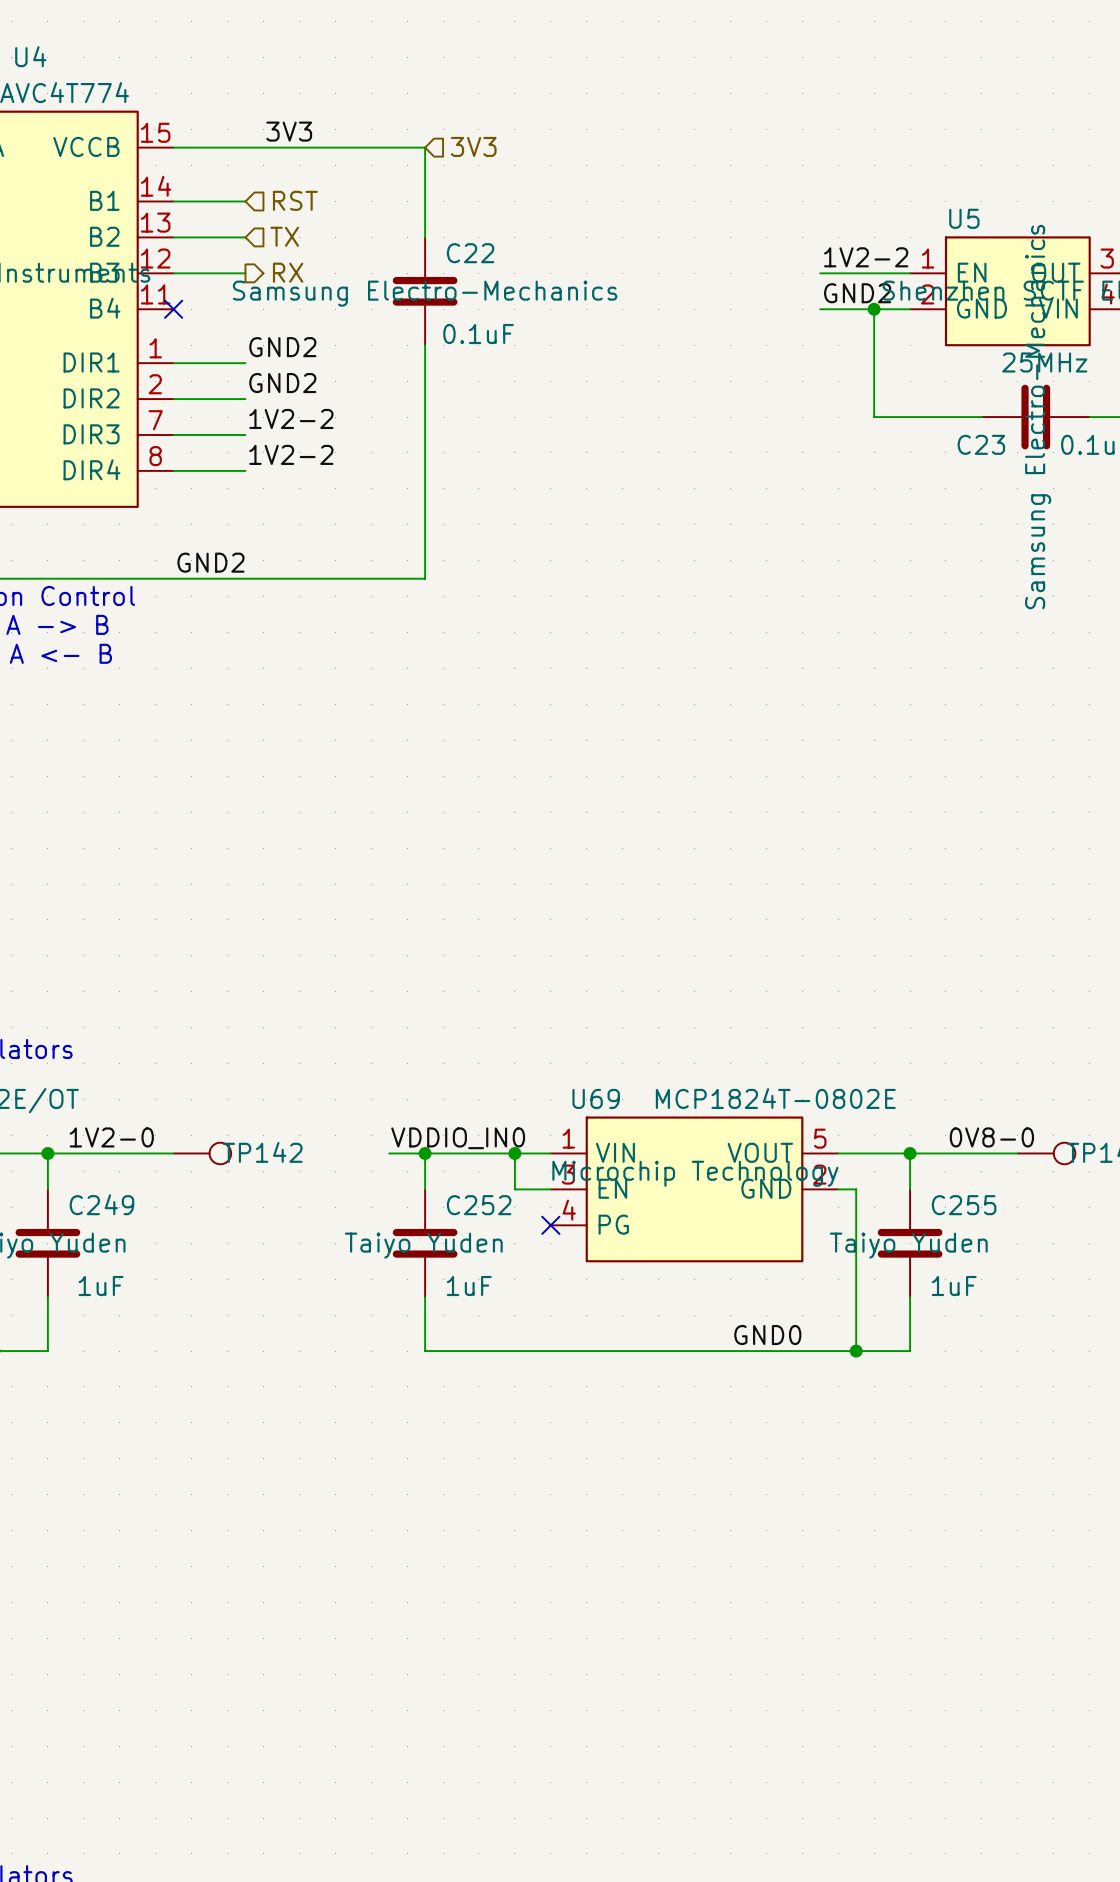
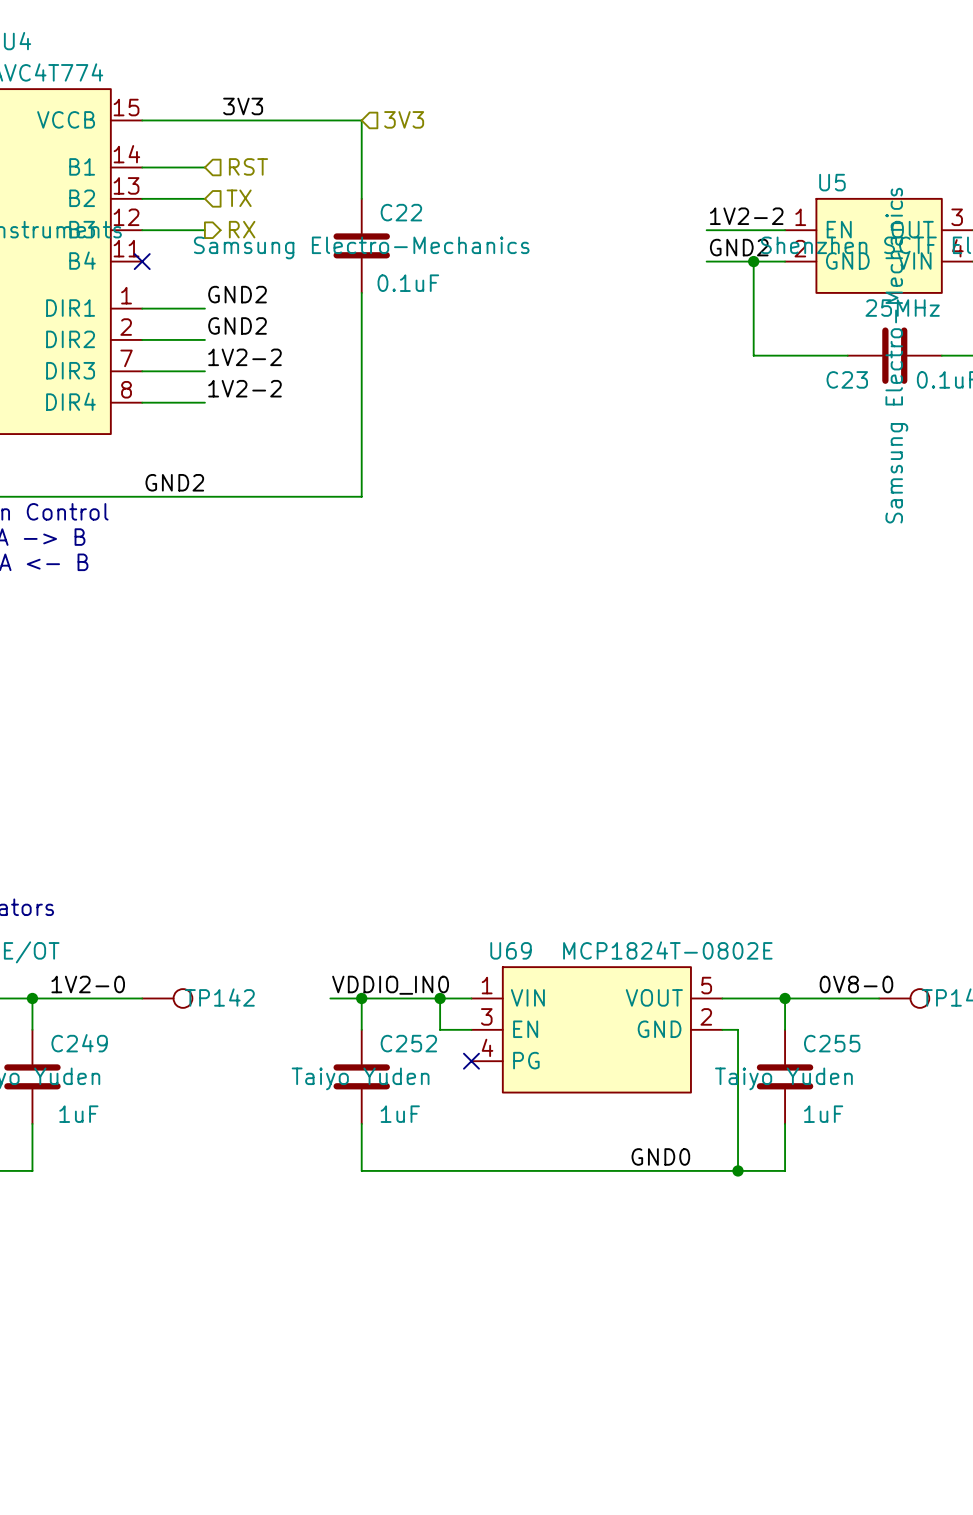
U69 text: Microchip Technology (695, 1173) -> none

